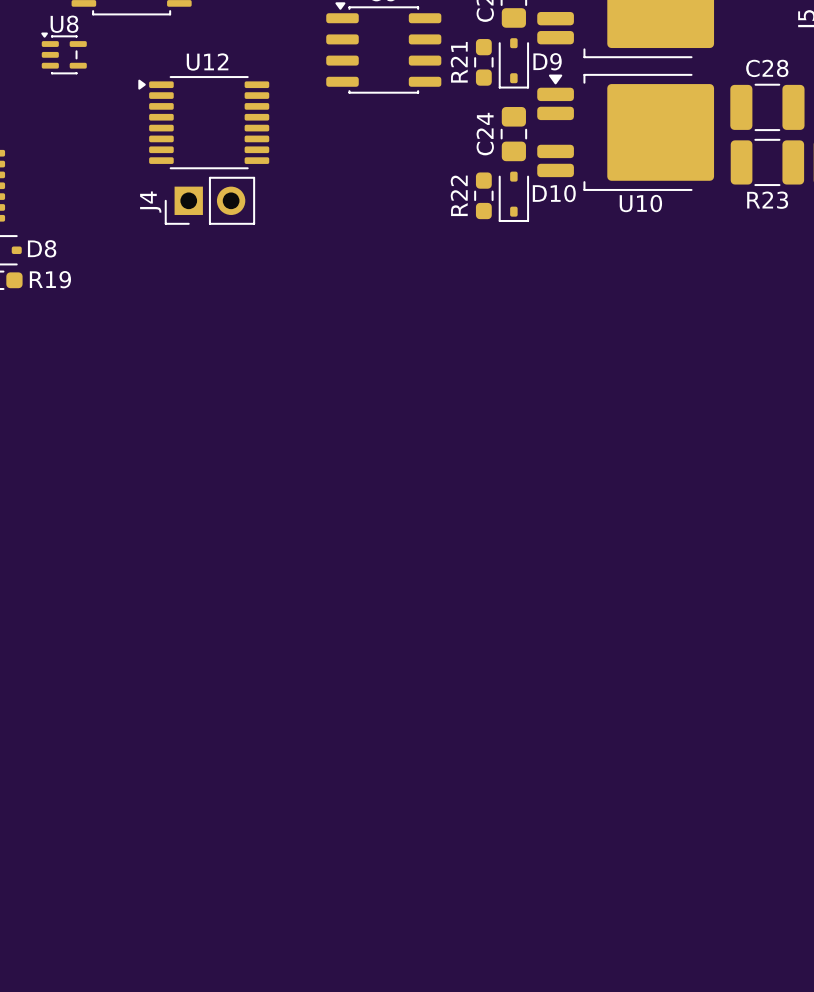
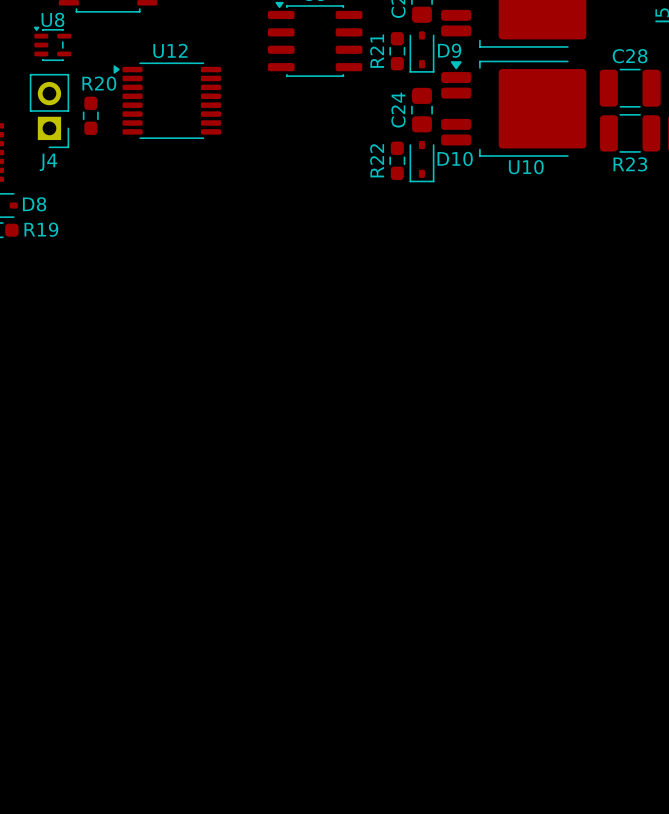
R20: none -> (90, 115)
J4 rotation: 0° (209, 200) -> 90° counterclockwise (49, 111)
J4 position: (209, 200) -> (49, 111)

